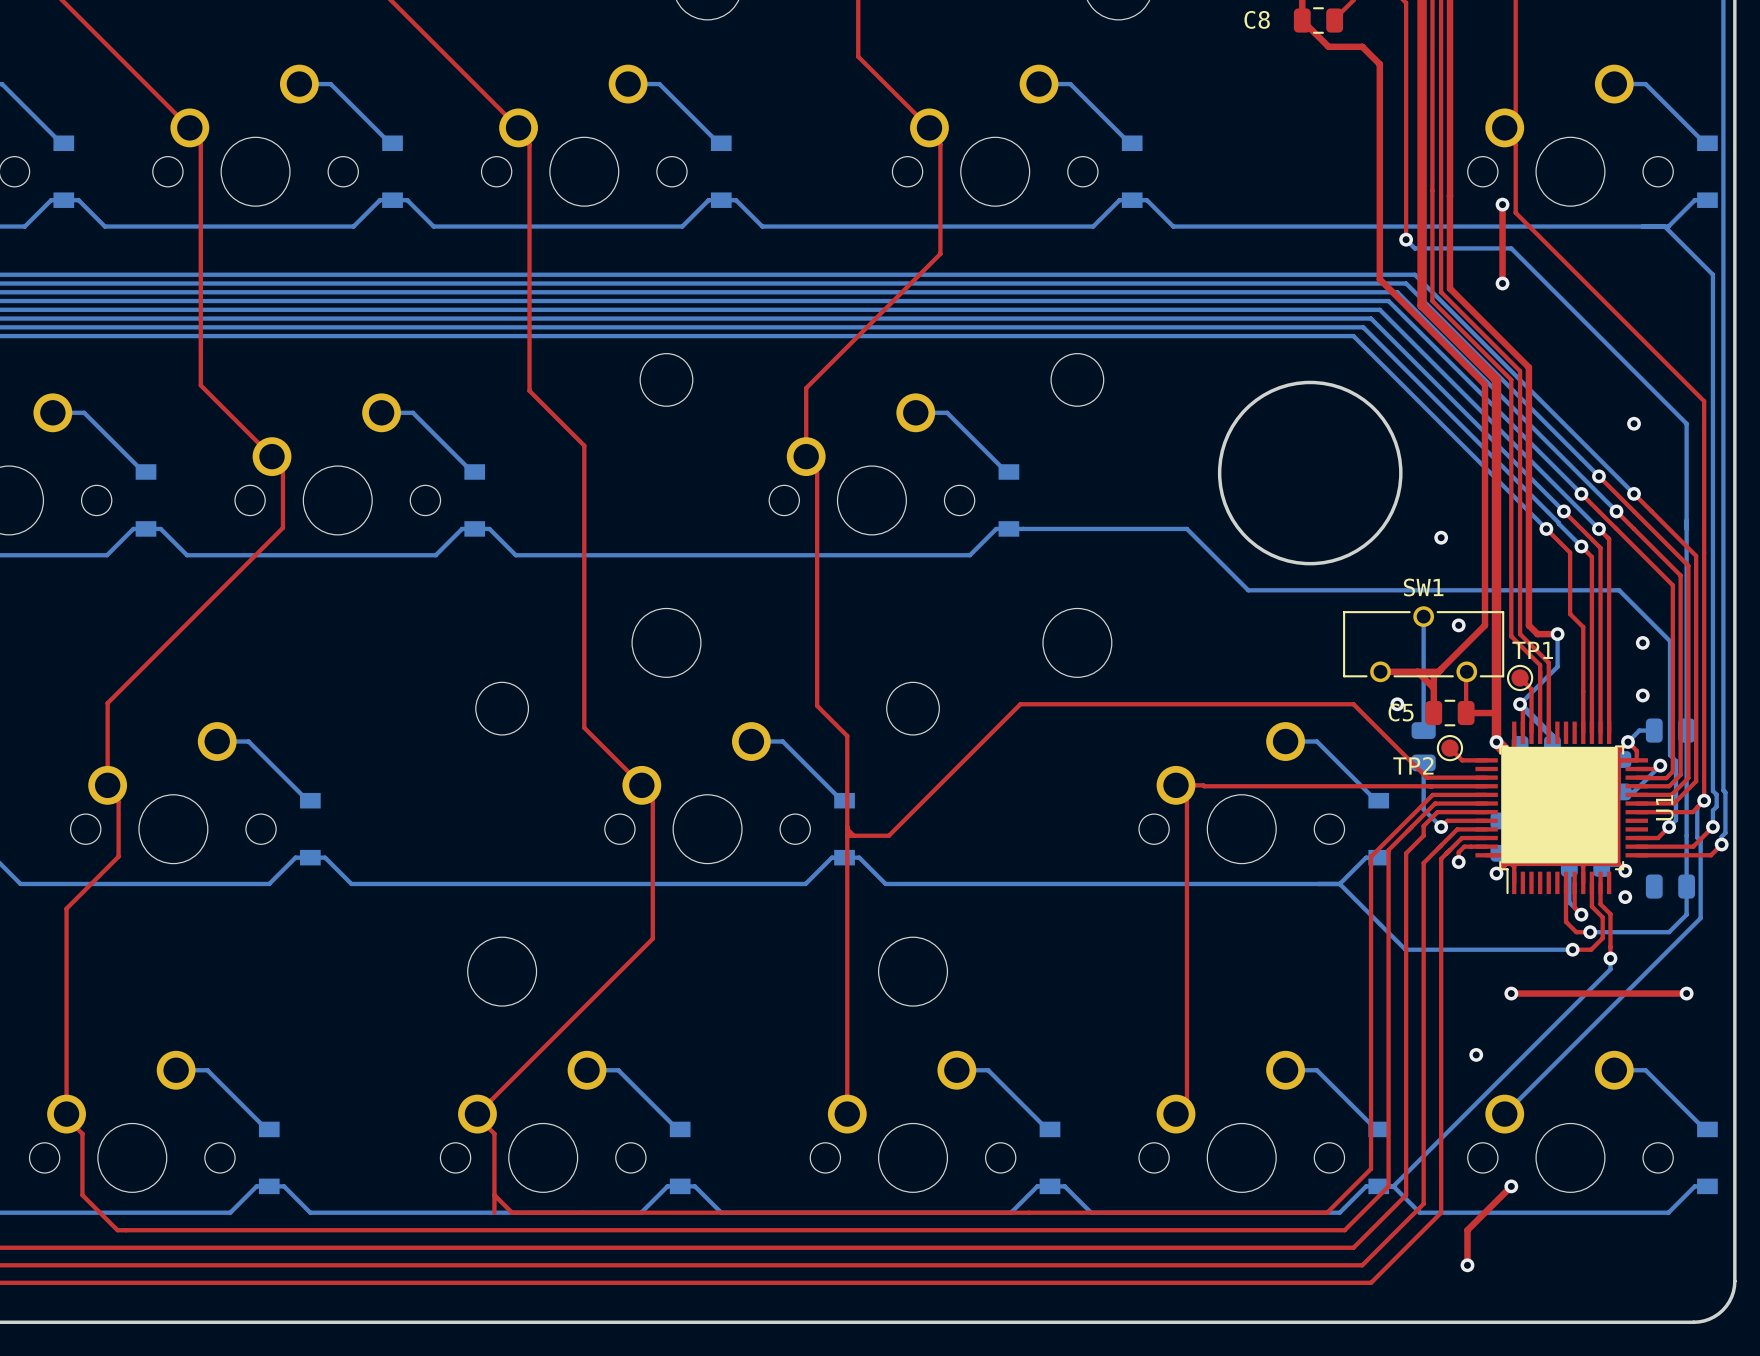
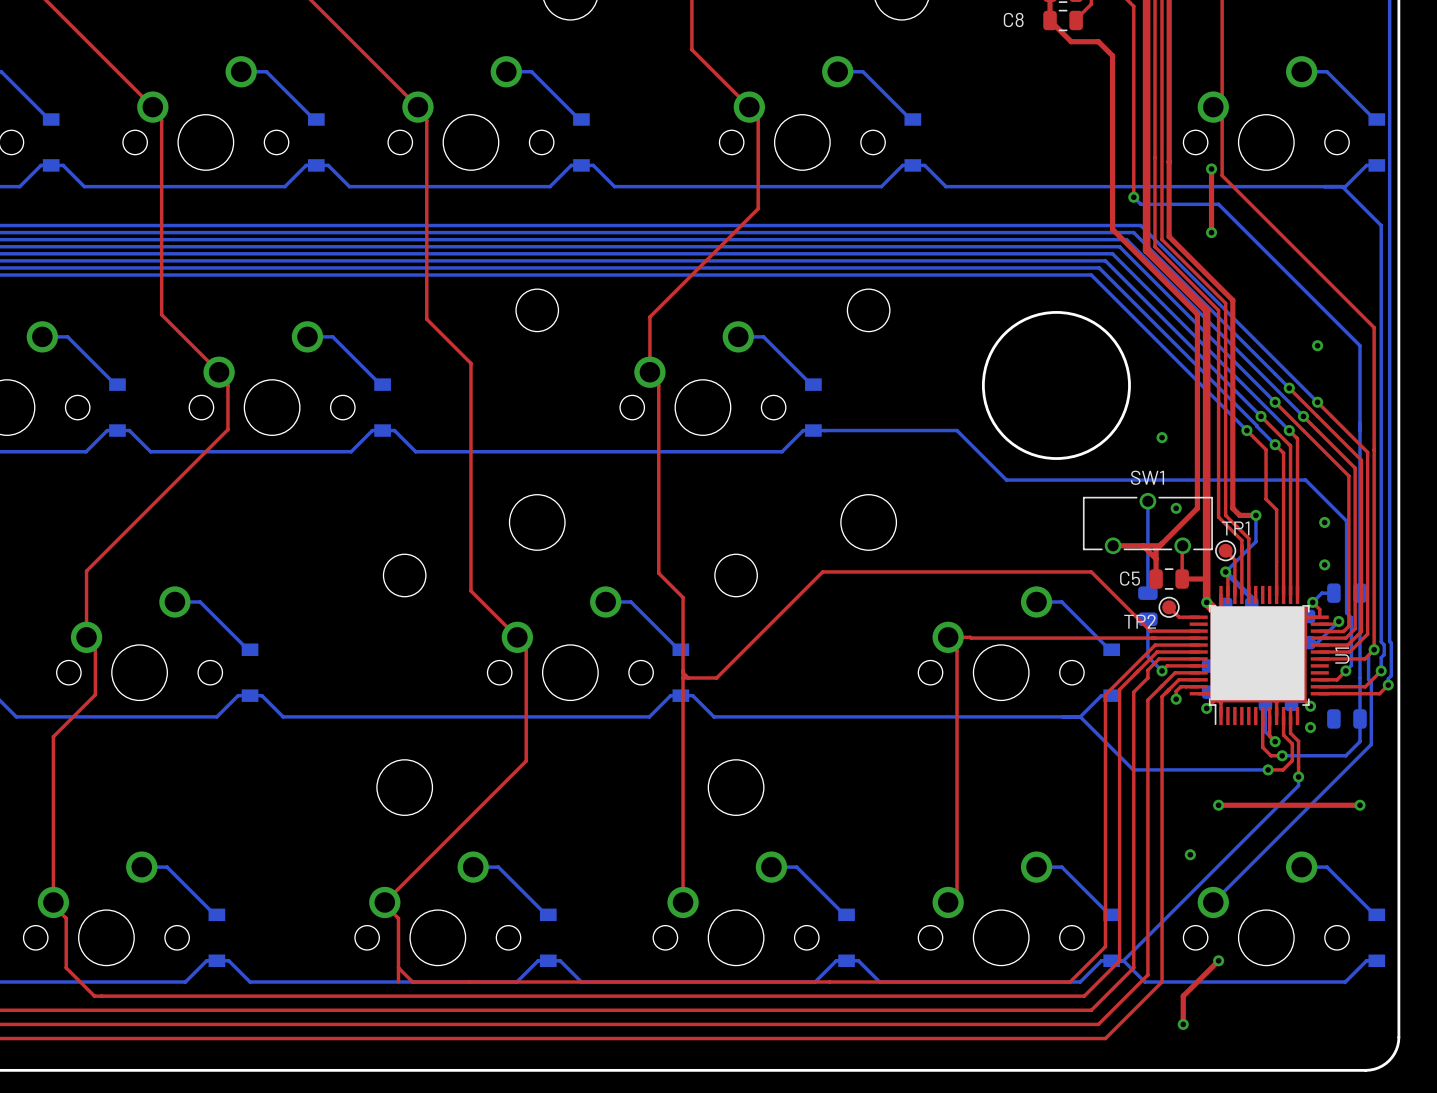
via: (1397, 704) -> none

